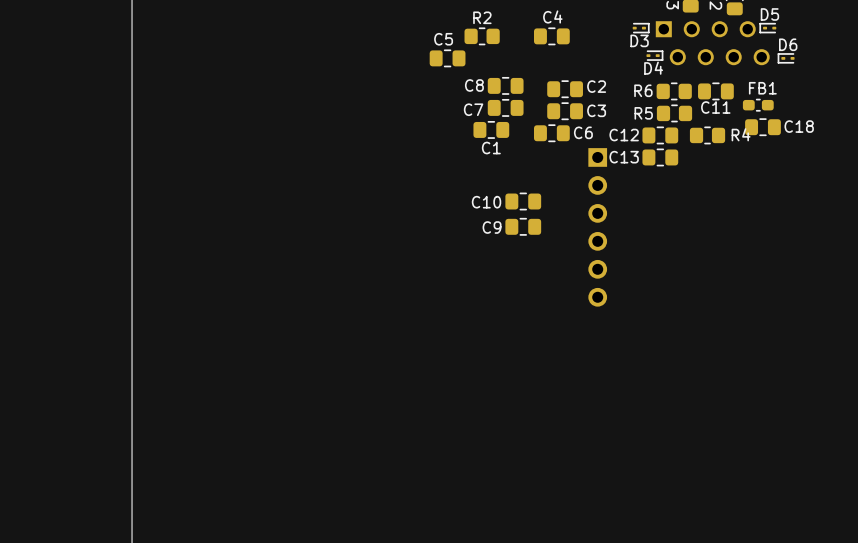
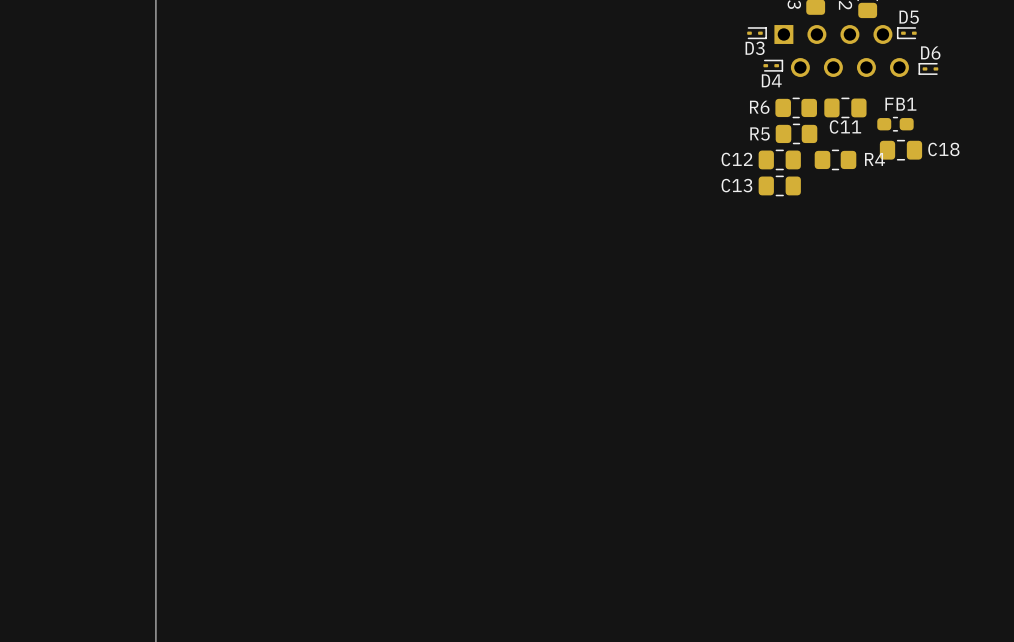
R2: (482, 36) -> none
C4: (551, 36) -> none
C5: (447, 58) -> none
C8: (505, 85) -> none
C2: (565, 89) -> none
C7: (505, 107) -> none
C3: (565, 111) -> none
C1: (491, 129) -> none
C6: (551, 133) -> none
C10: (523, 201) -> none
C9: (523, 226) -> none
part: (597, 227) -> none

